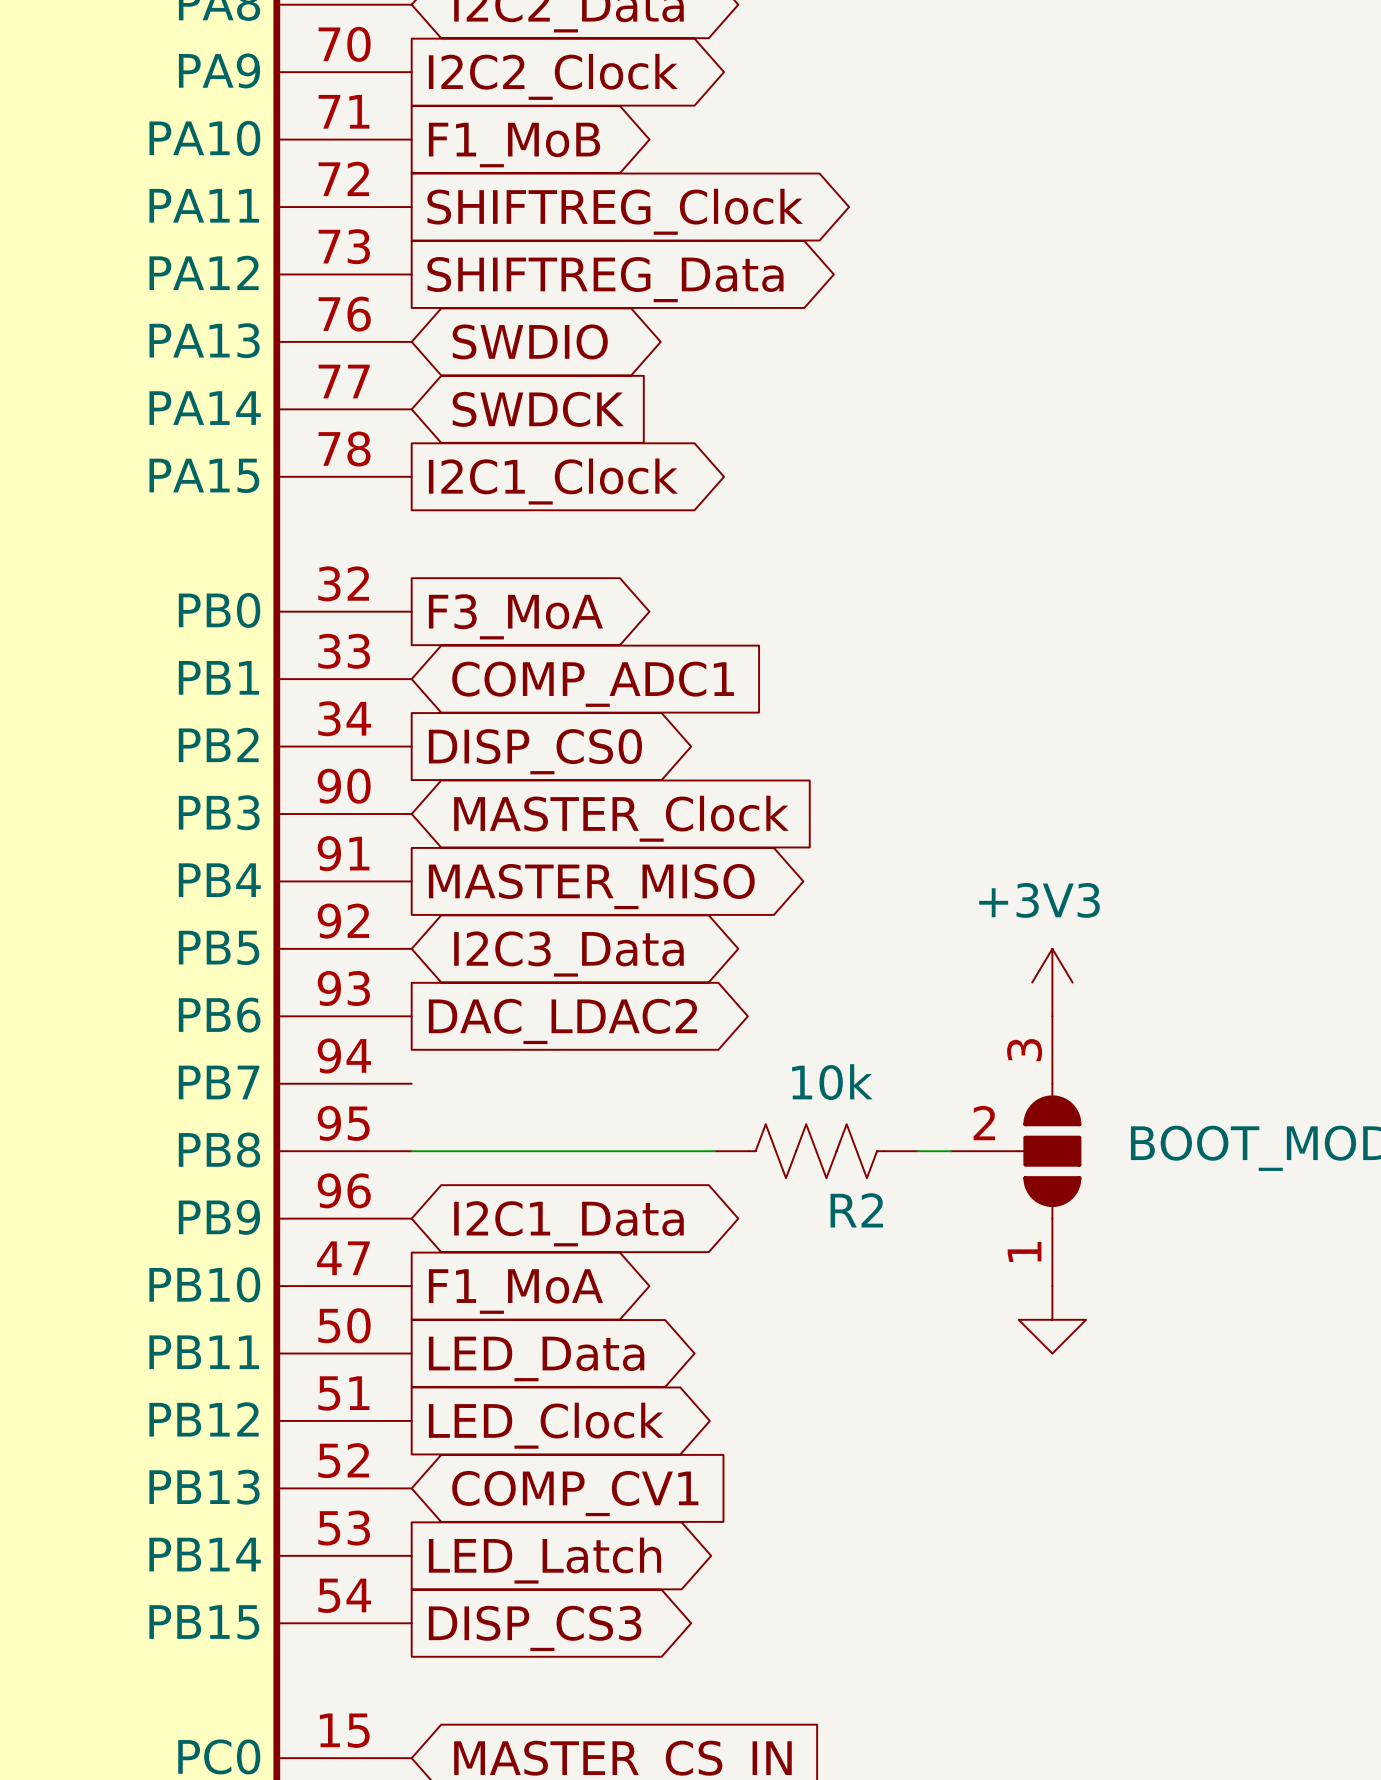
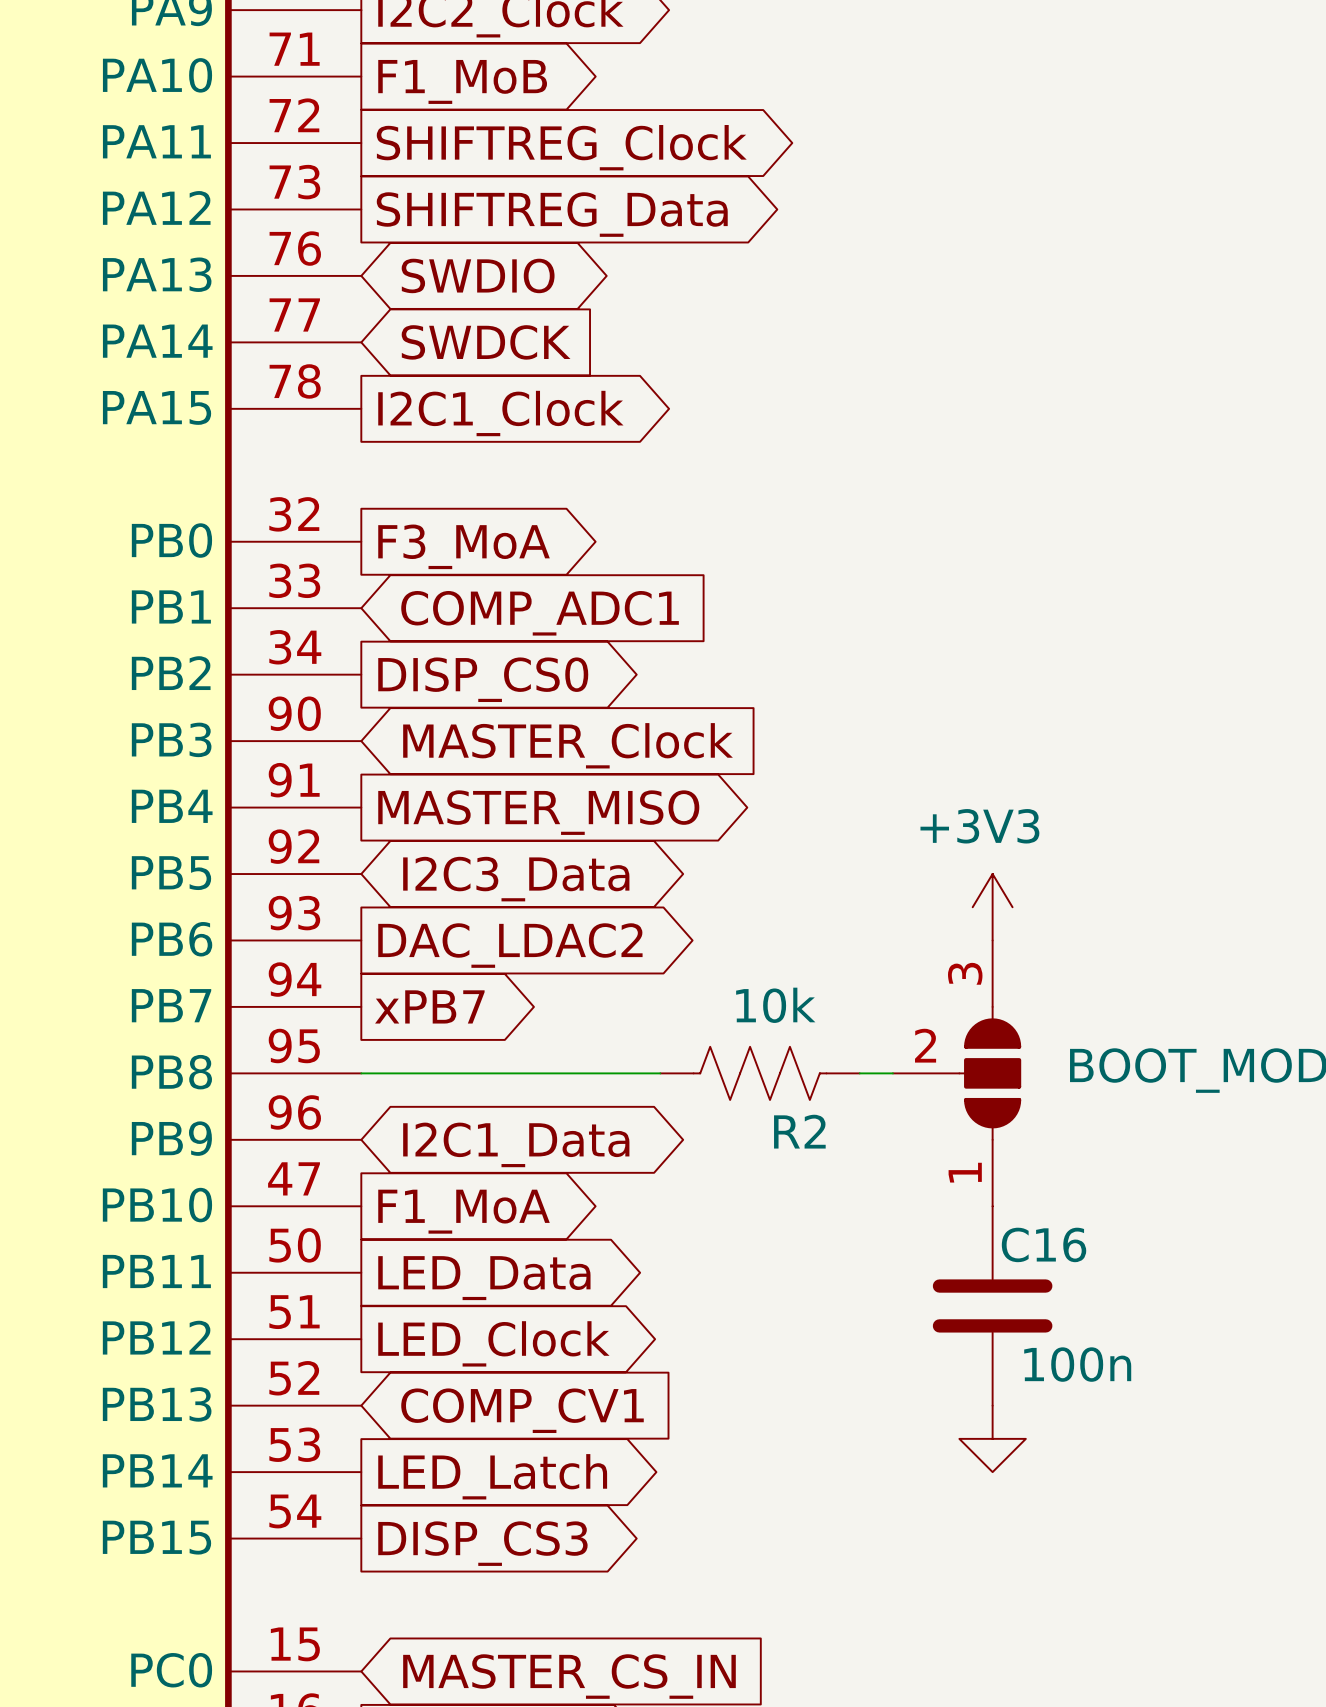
global label: none -> xPB7 (429, 1006)
power symbol position: (1052, 1319) -> (992, 1438)
C16: none -> 100n (992, 1305)

